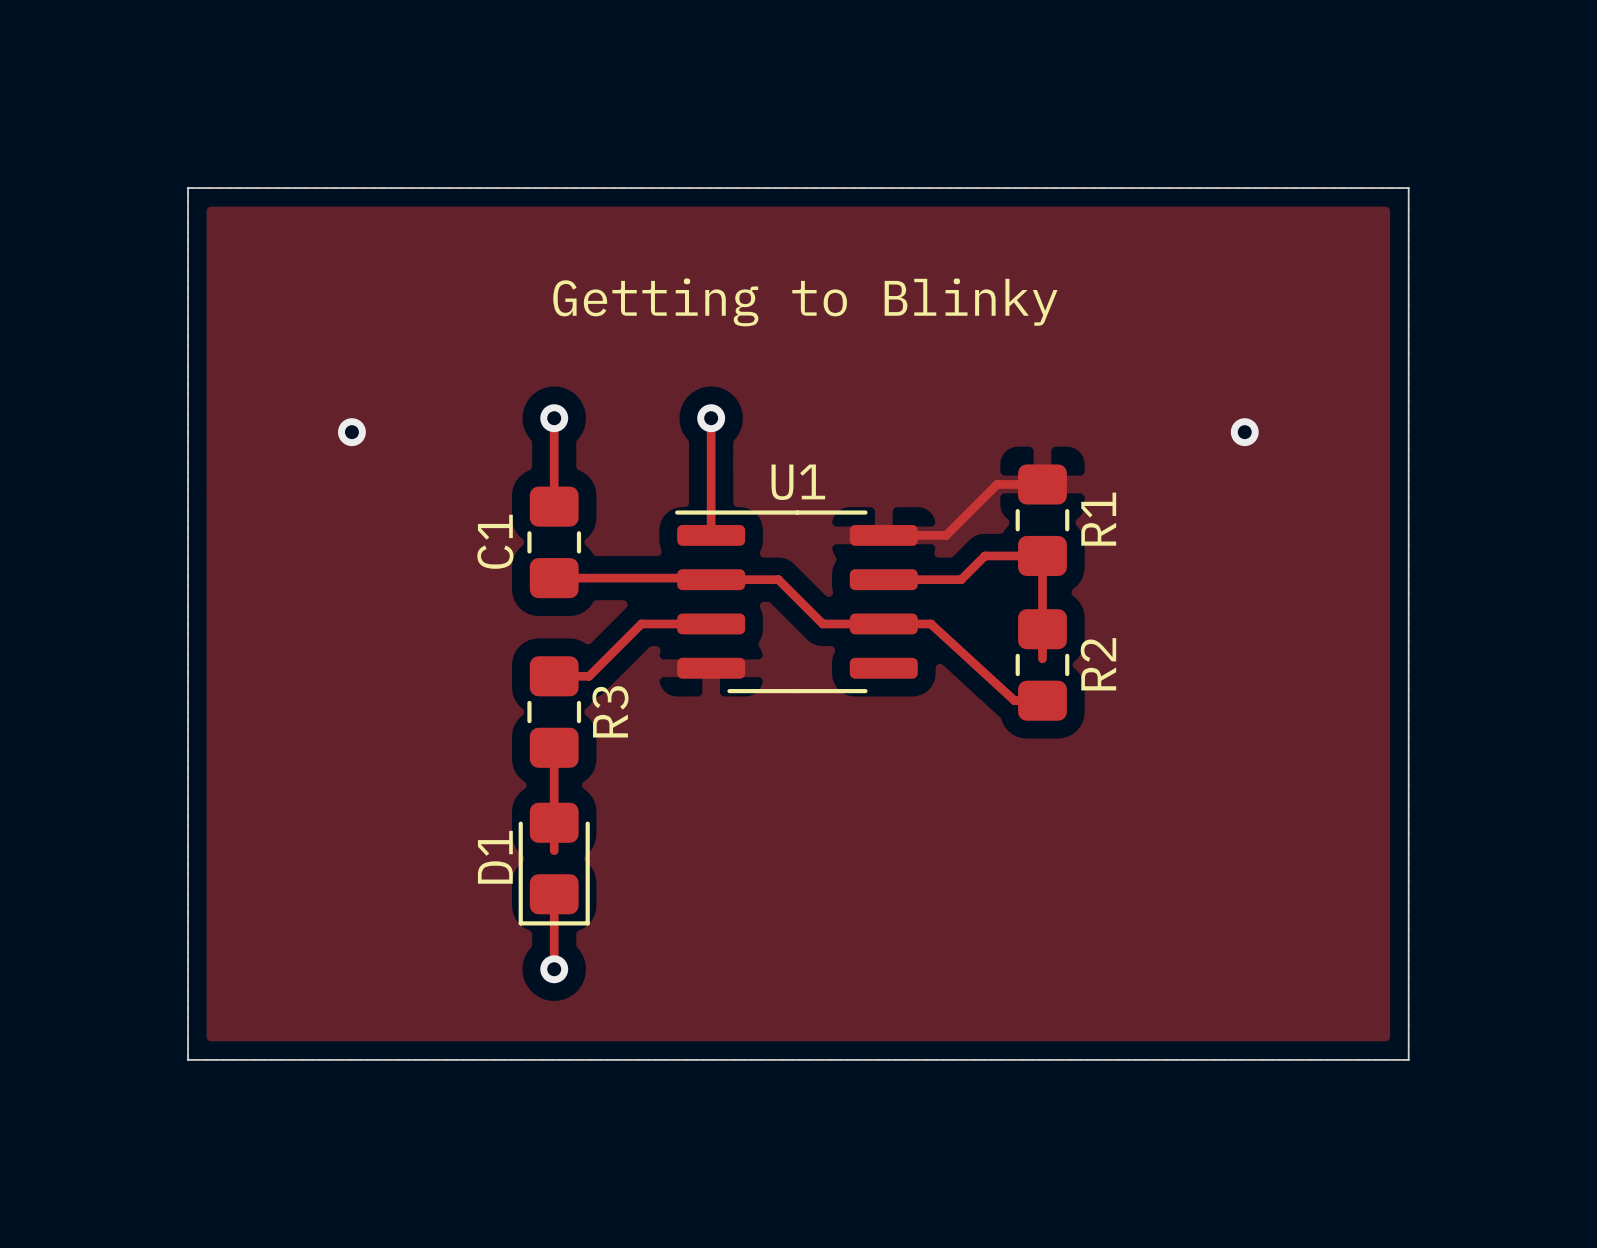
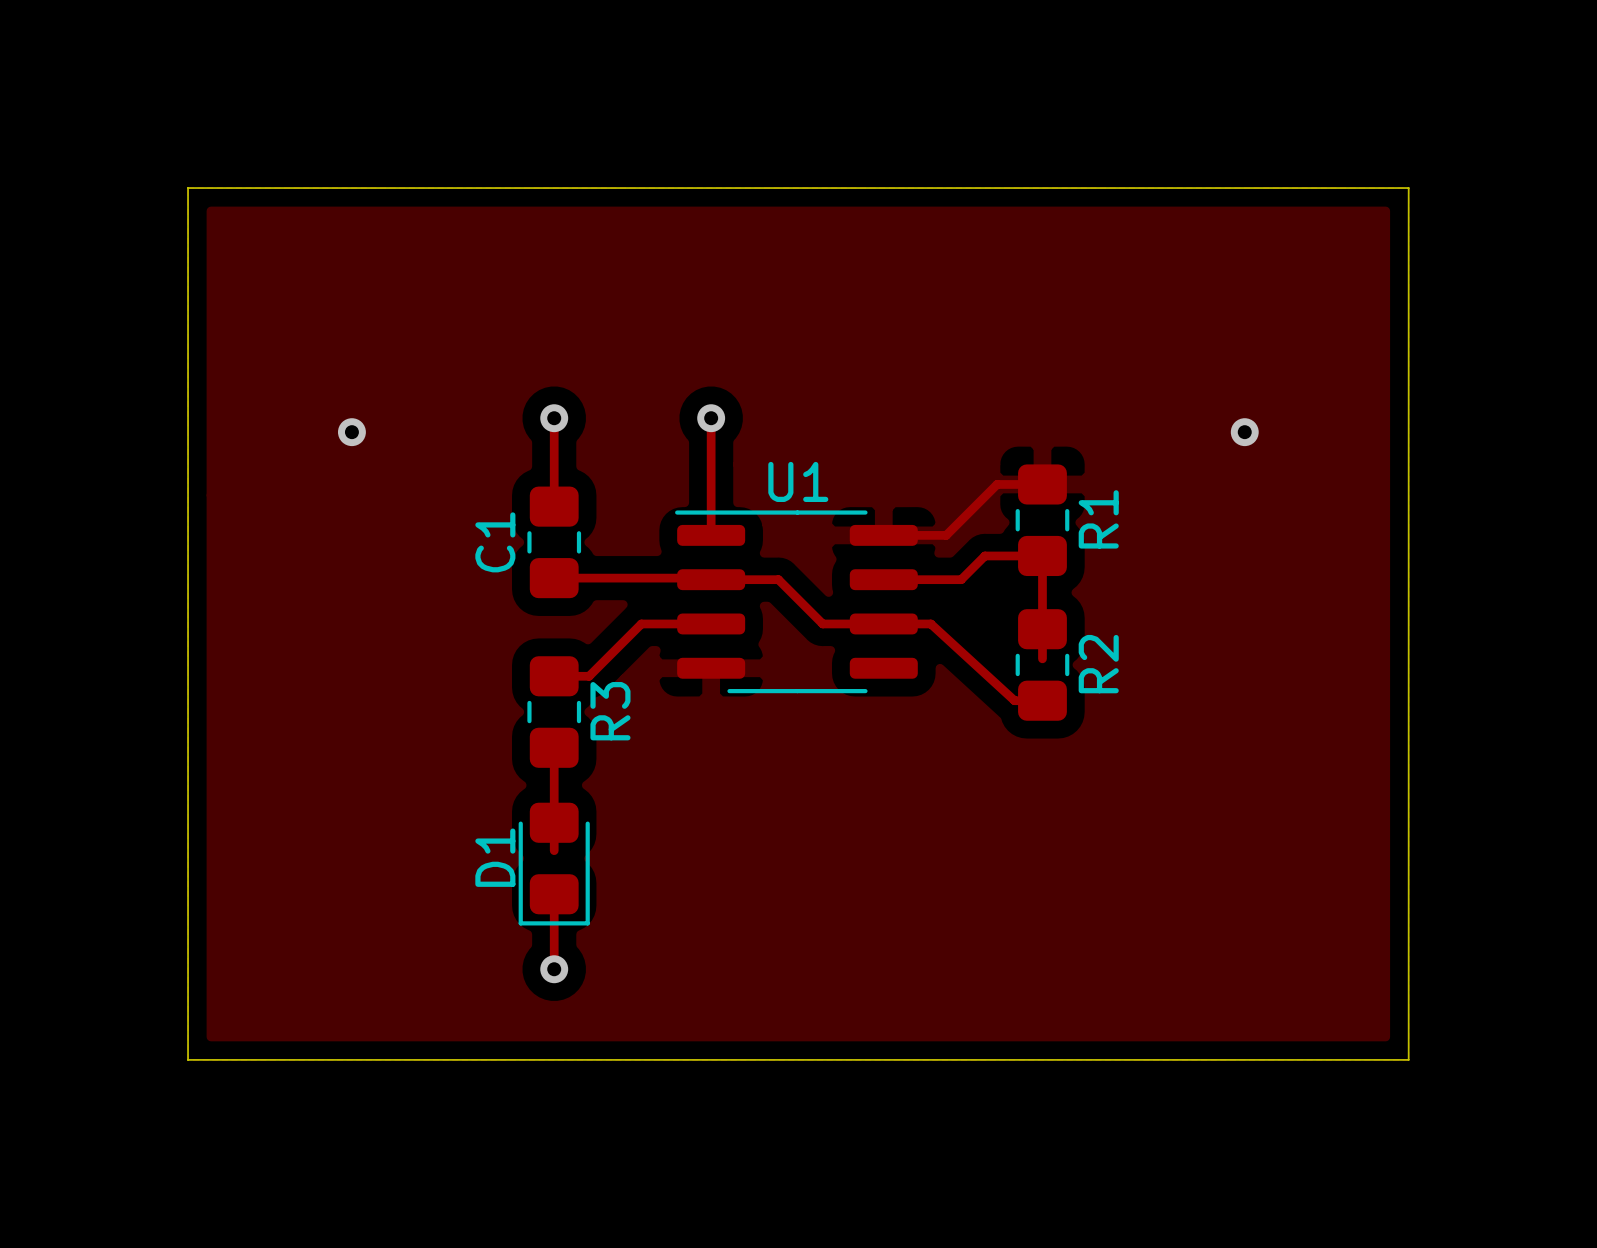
text: Getting to Blinky (805, 302) -> none

